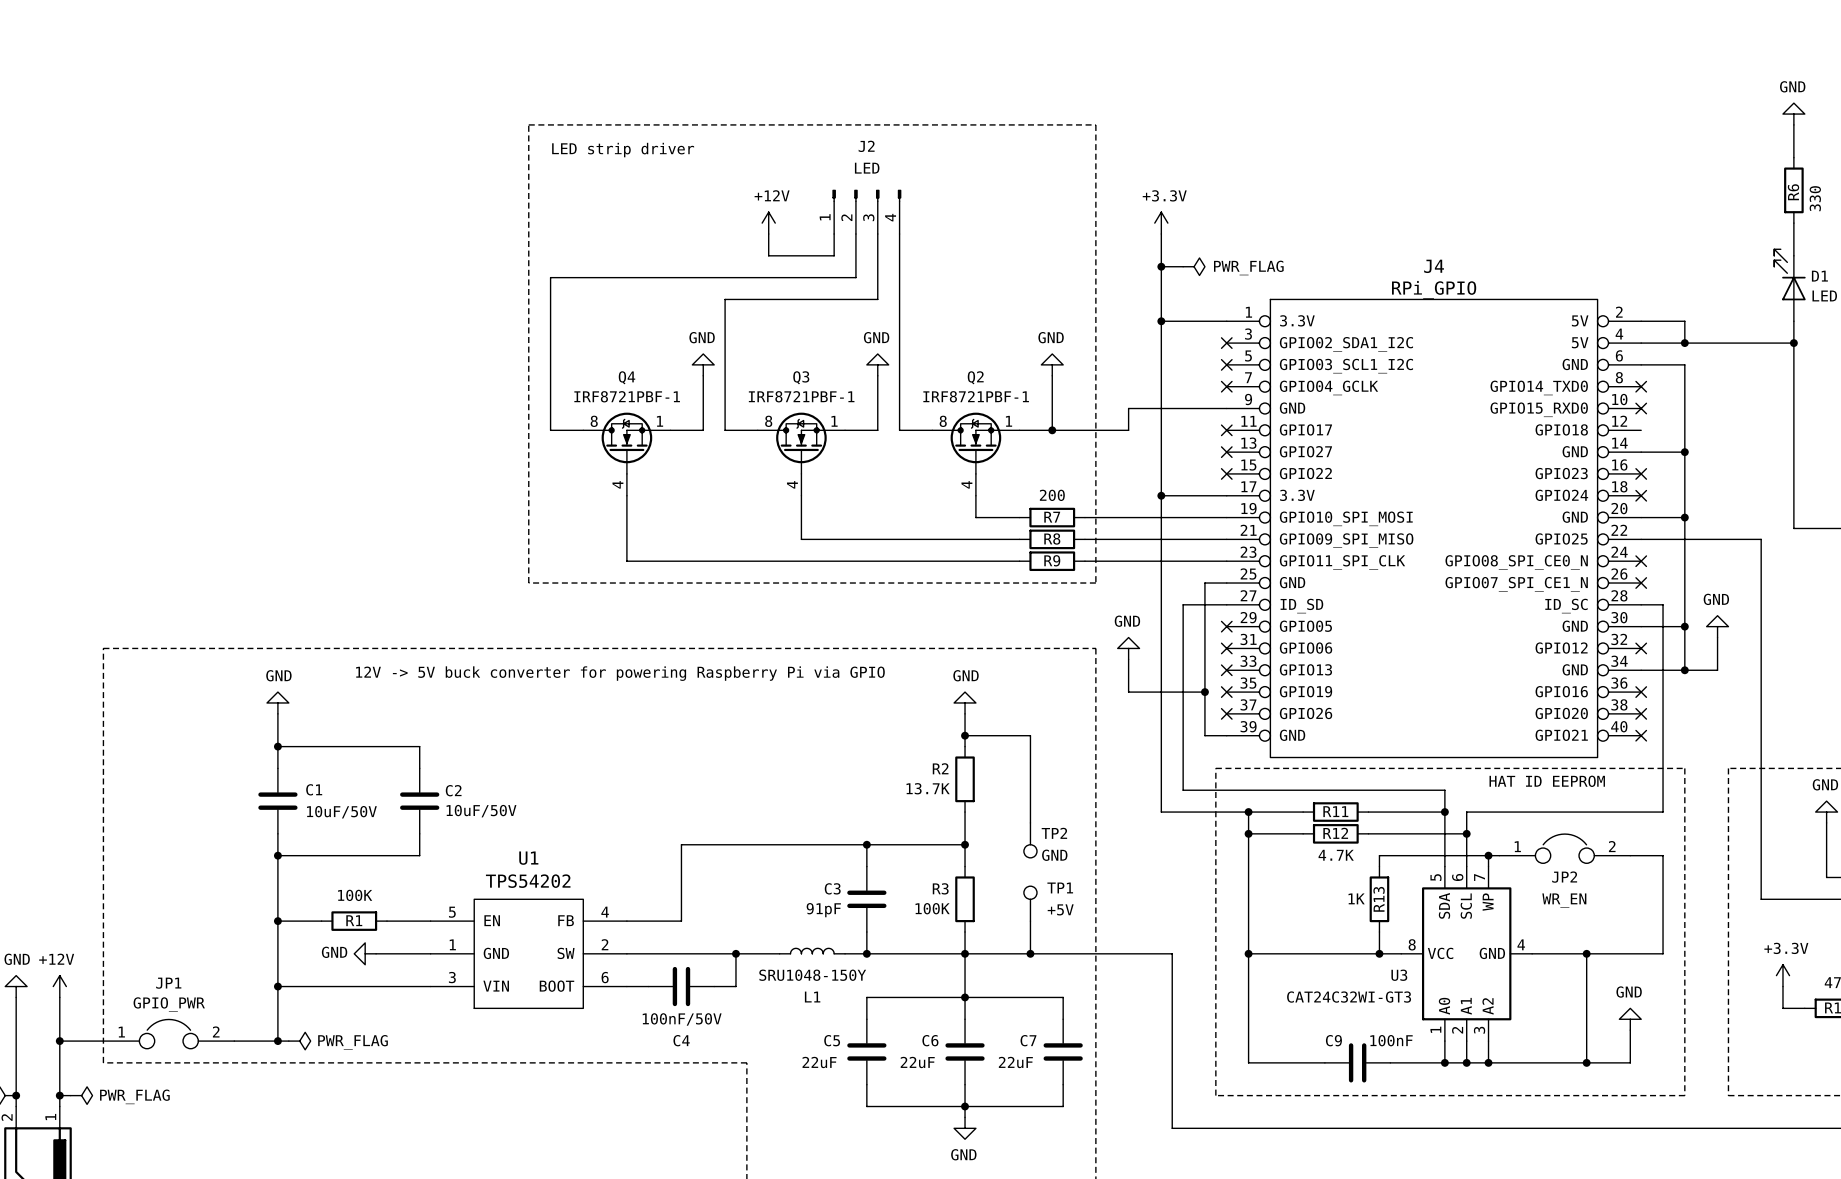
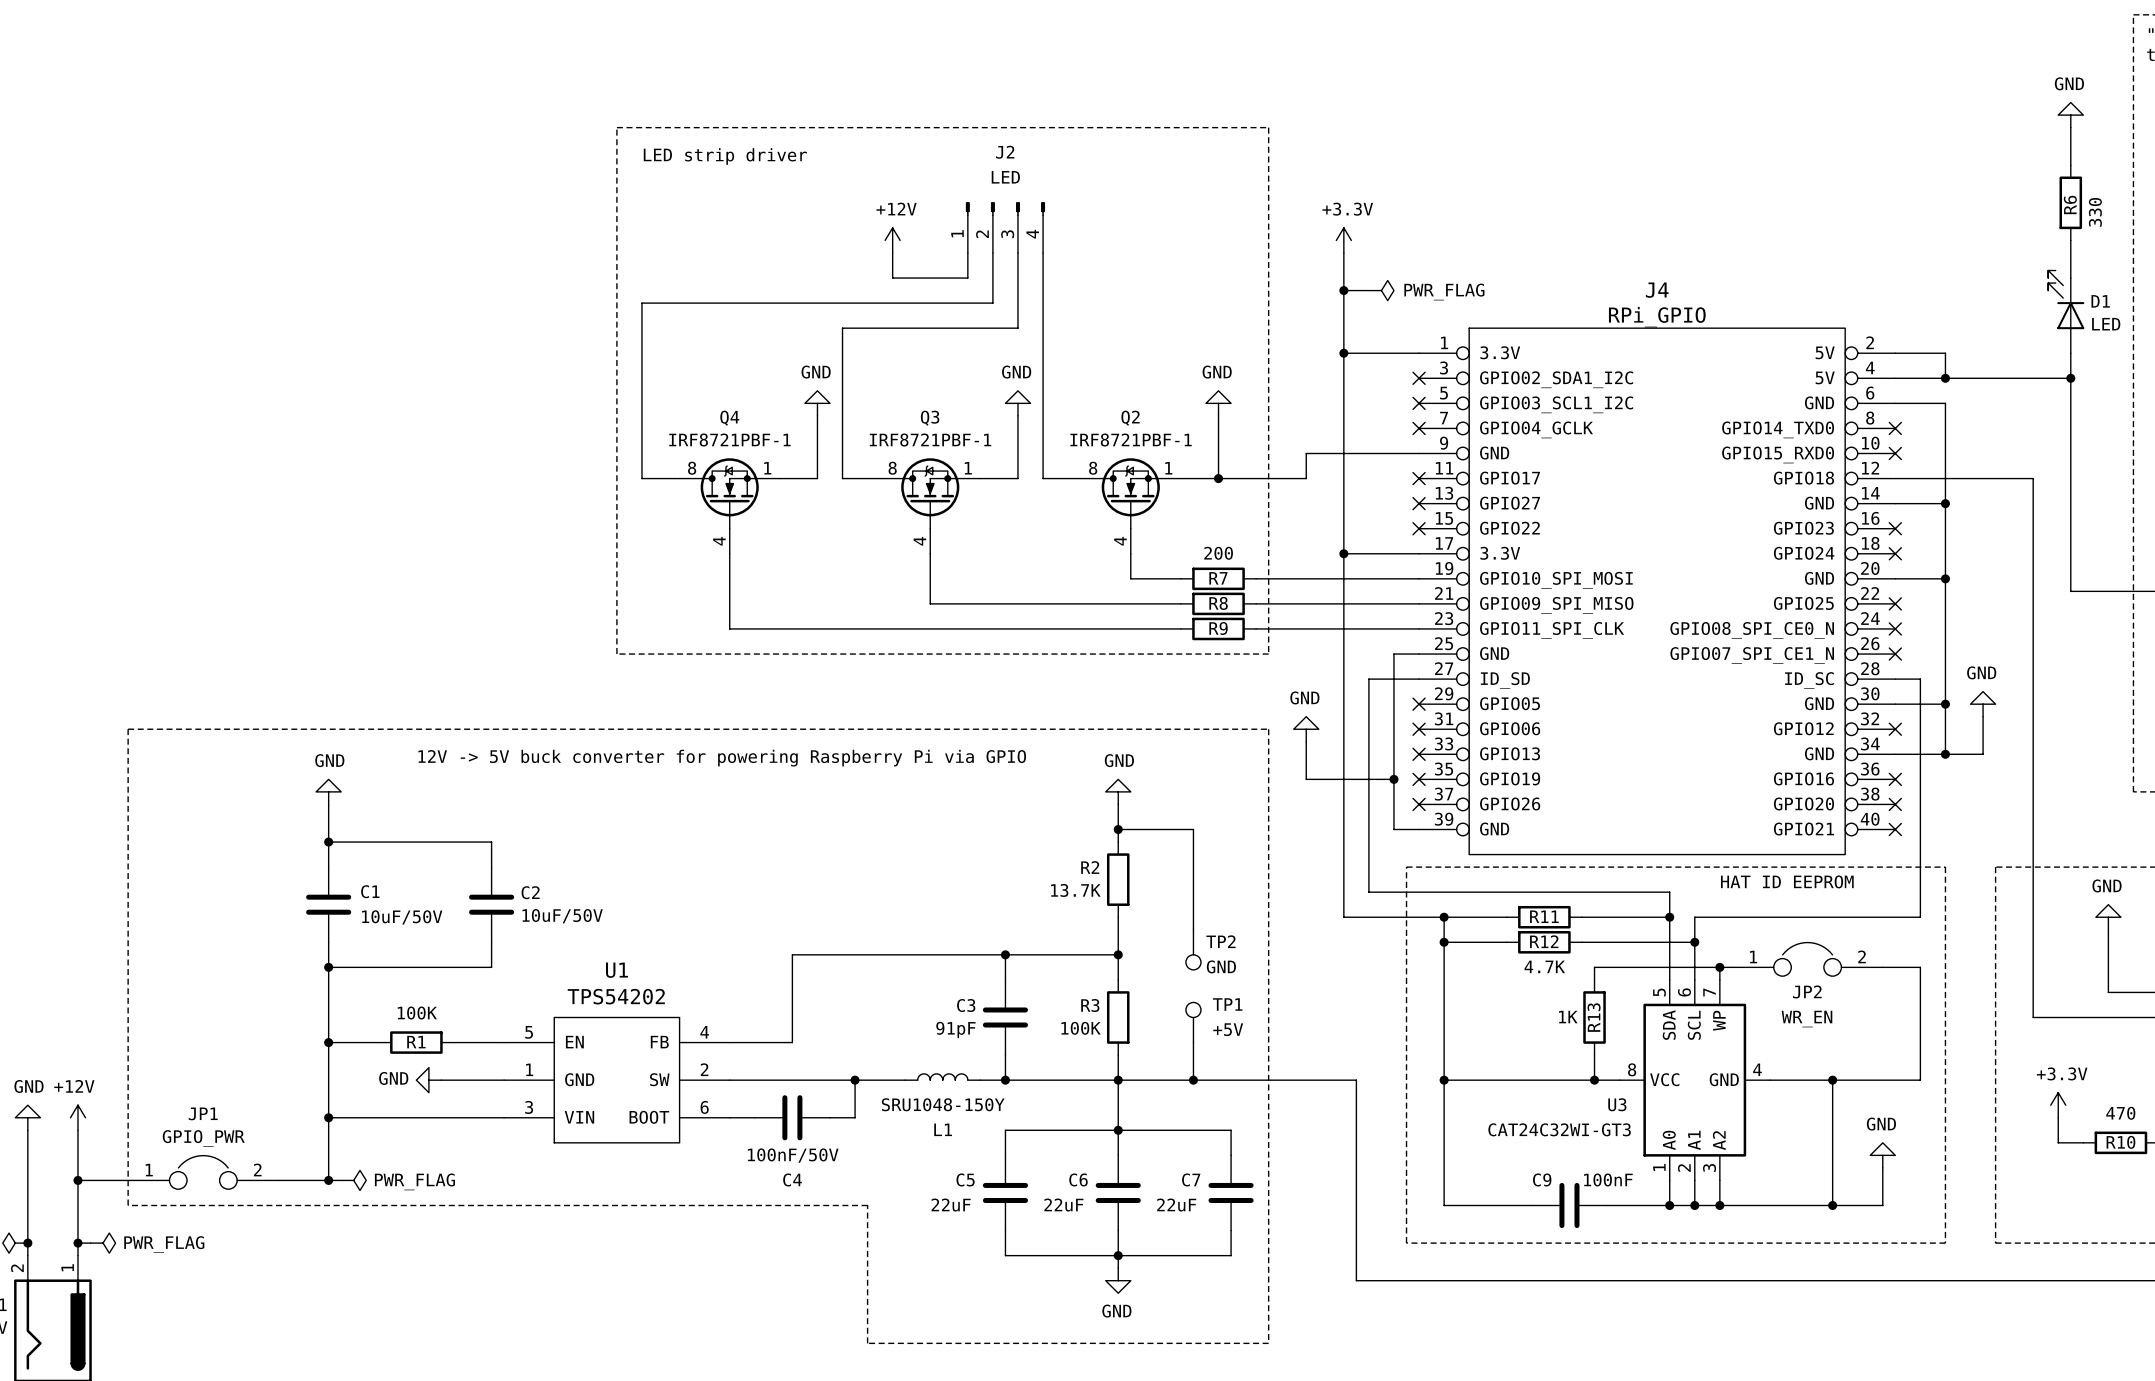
wire: (1641, 539) (1761, 539) -> (1895, 478) (2033, 478) (2033, 603)
no-connect mark: none -> (1895, 603)

